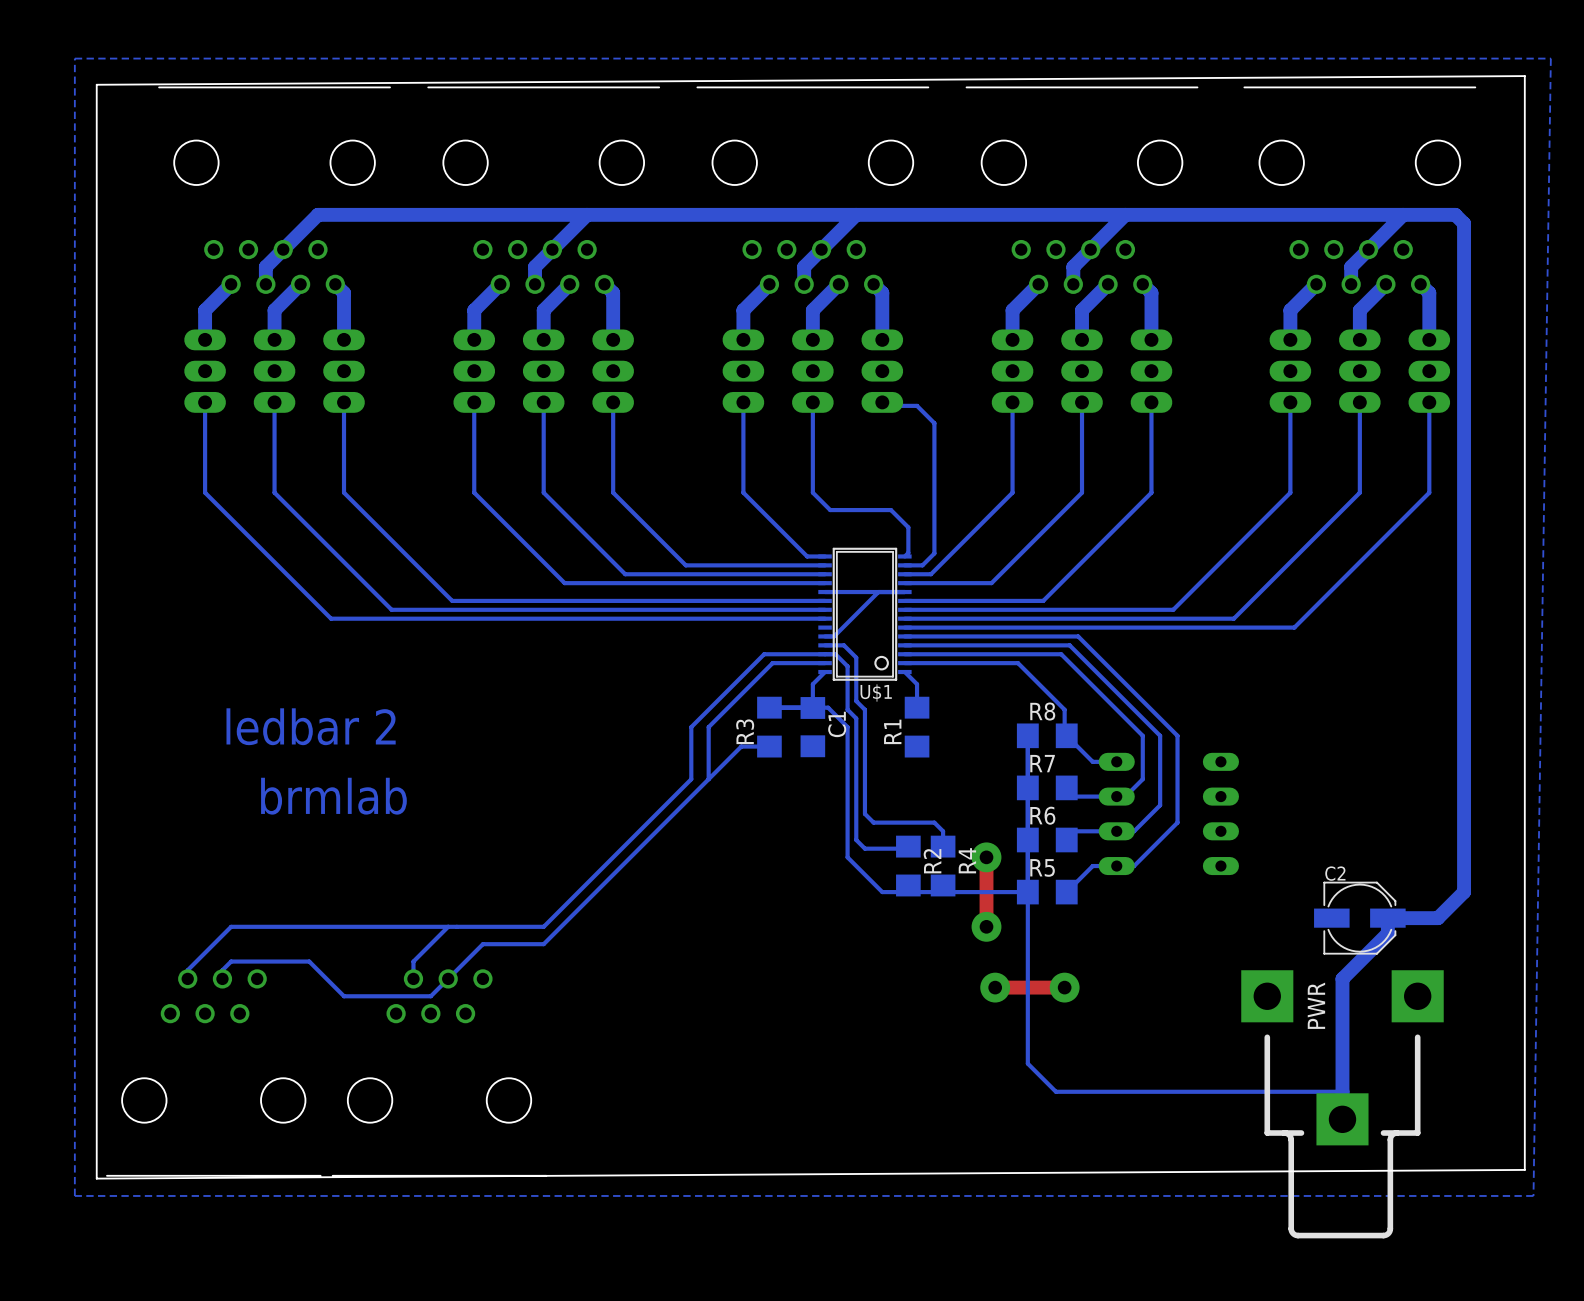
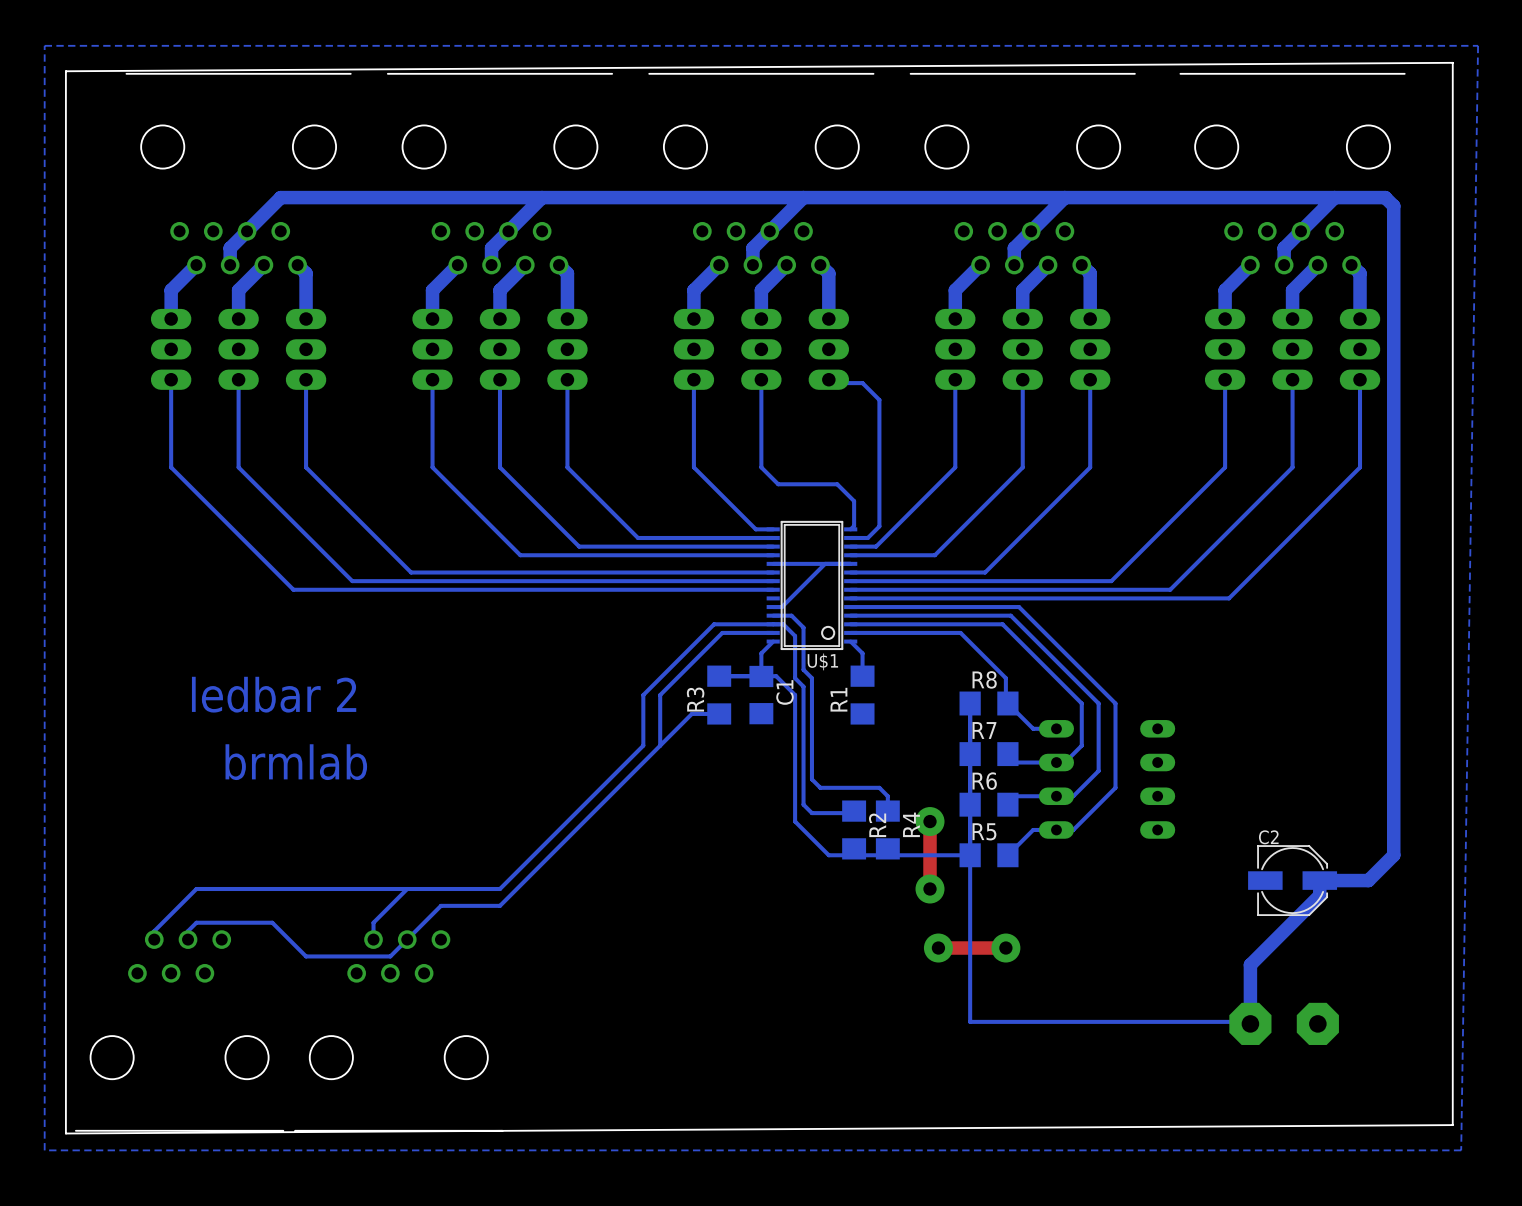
bottom track: (1342, 978) (1342, 1119) -> none
bottom track: (1027, 1063) (1055, 1091) (1342, 1091) -> (970, 1021) (1250, 1021) (1250, 1023) (1250, 964) (1275, 939)
part: none -> (1250, 1023)
part: none -> (1317, 1023)
PWR: (1342, 1104) -> none

